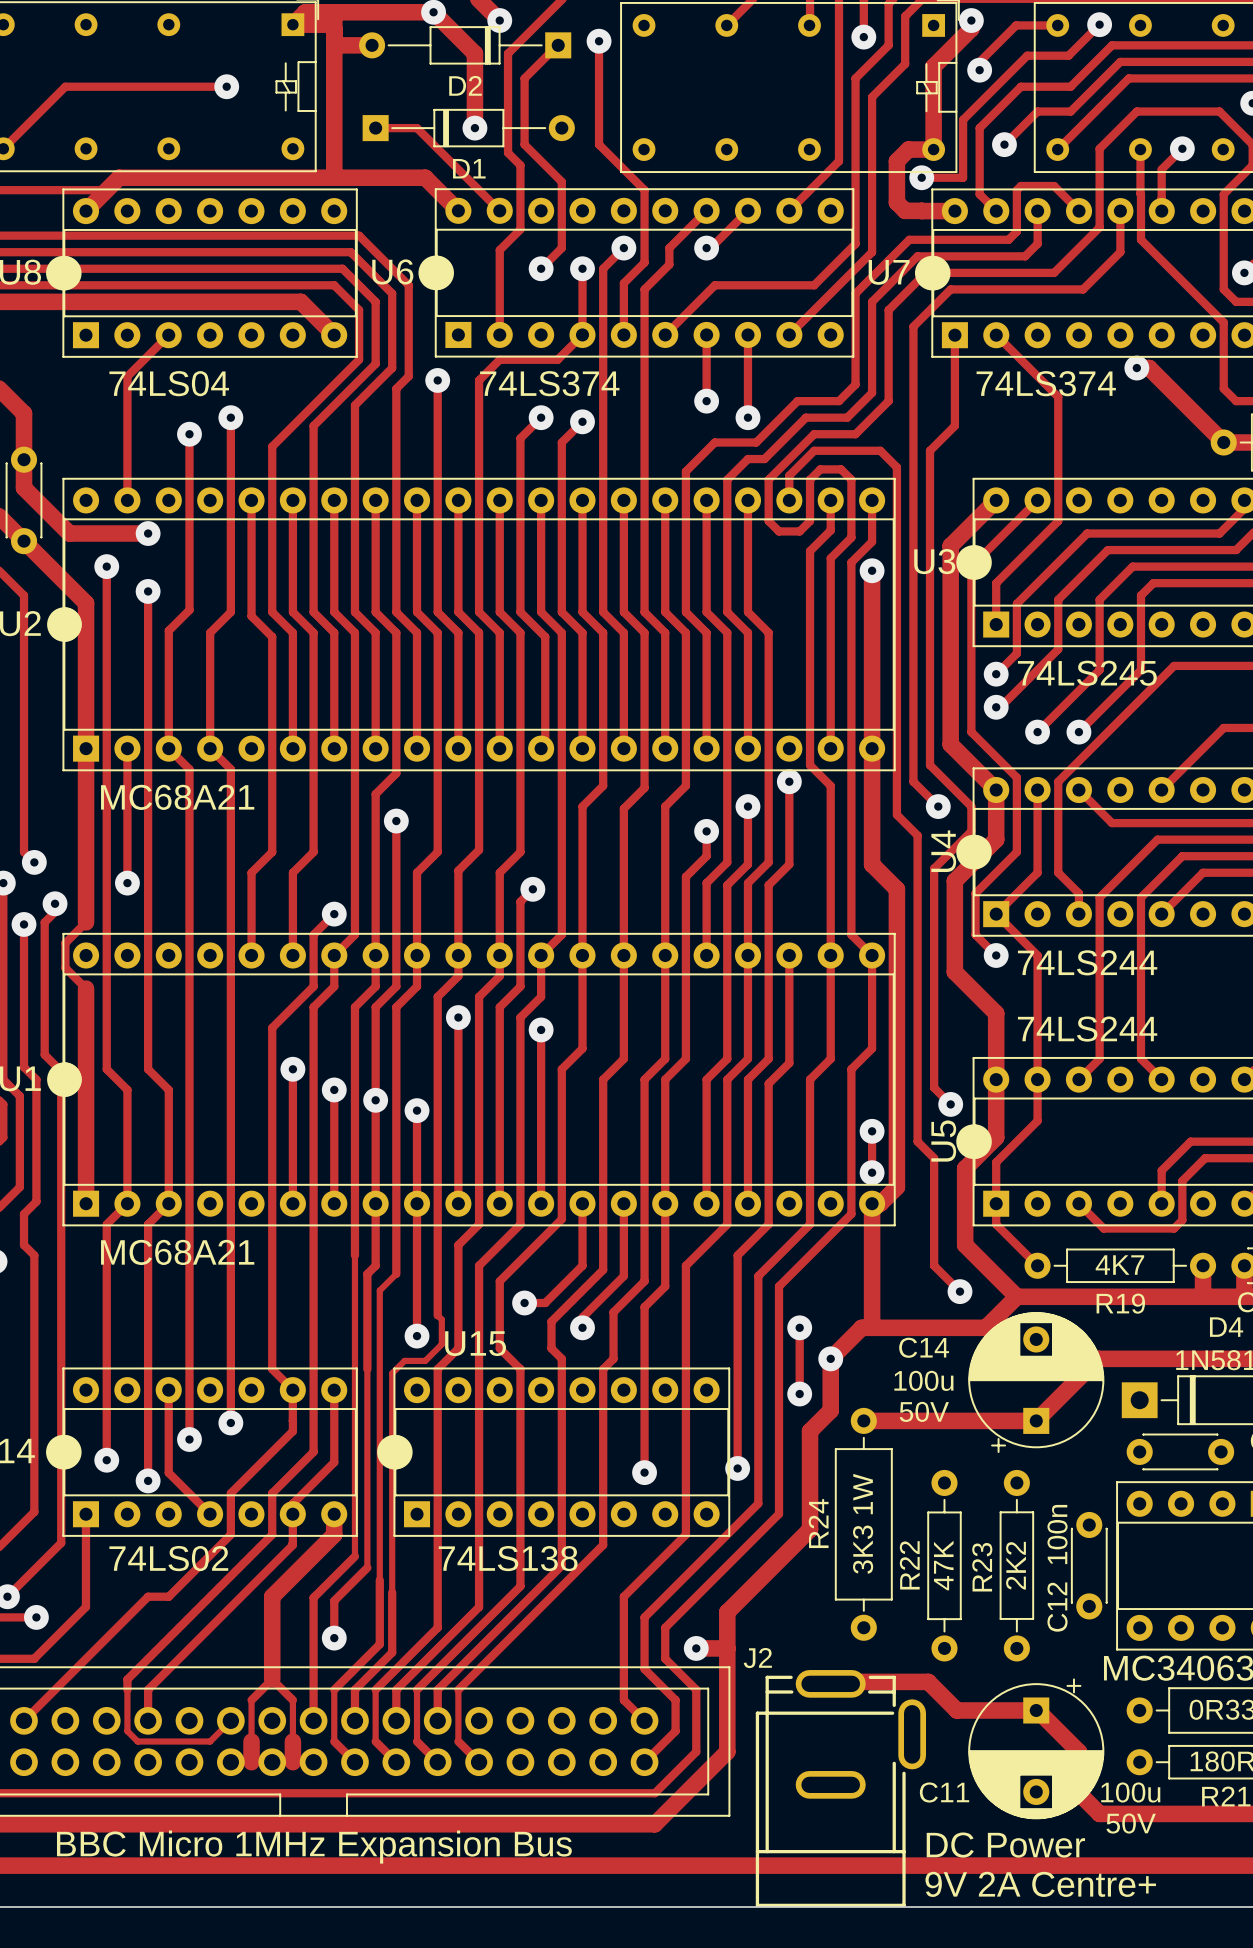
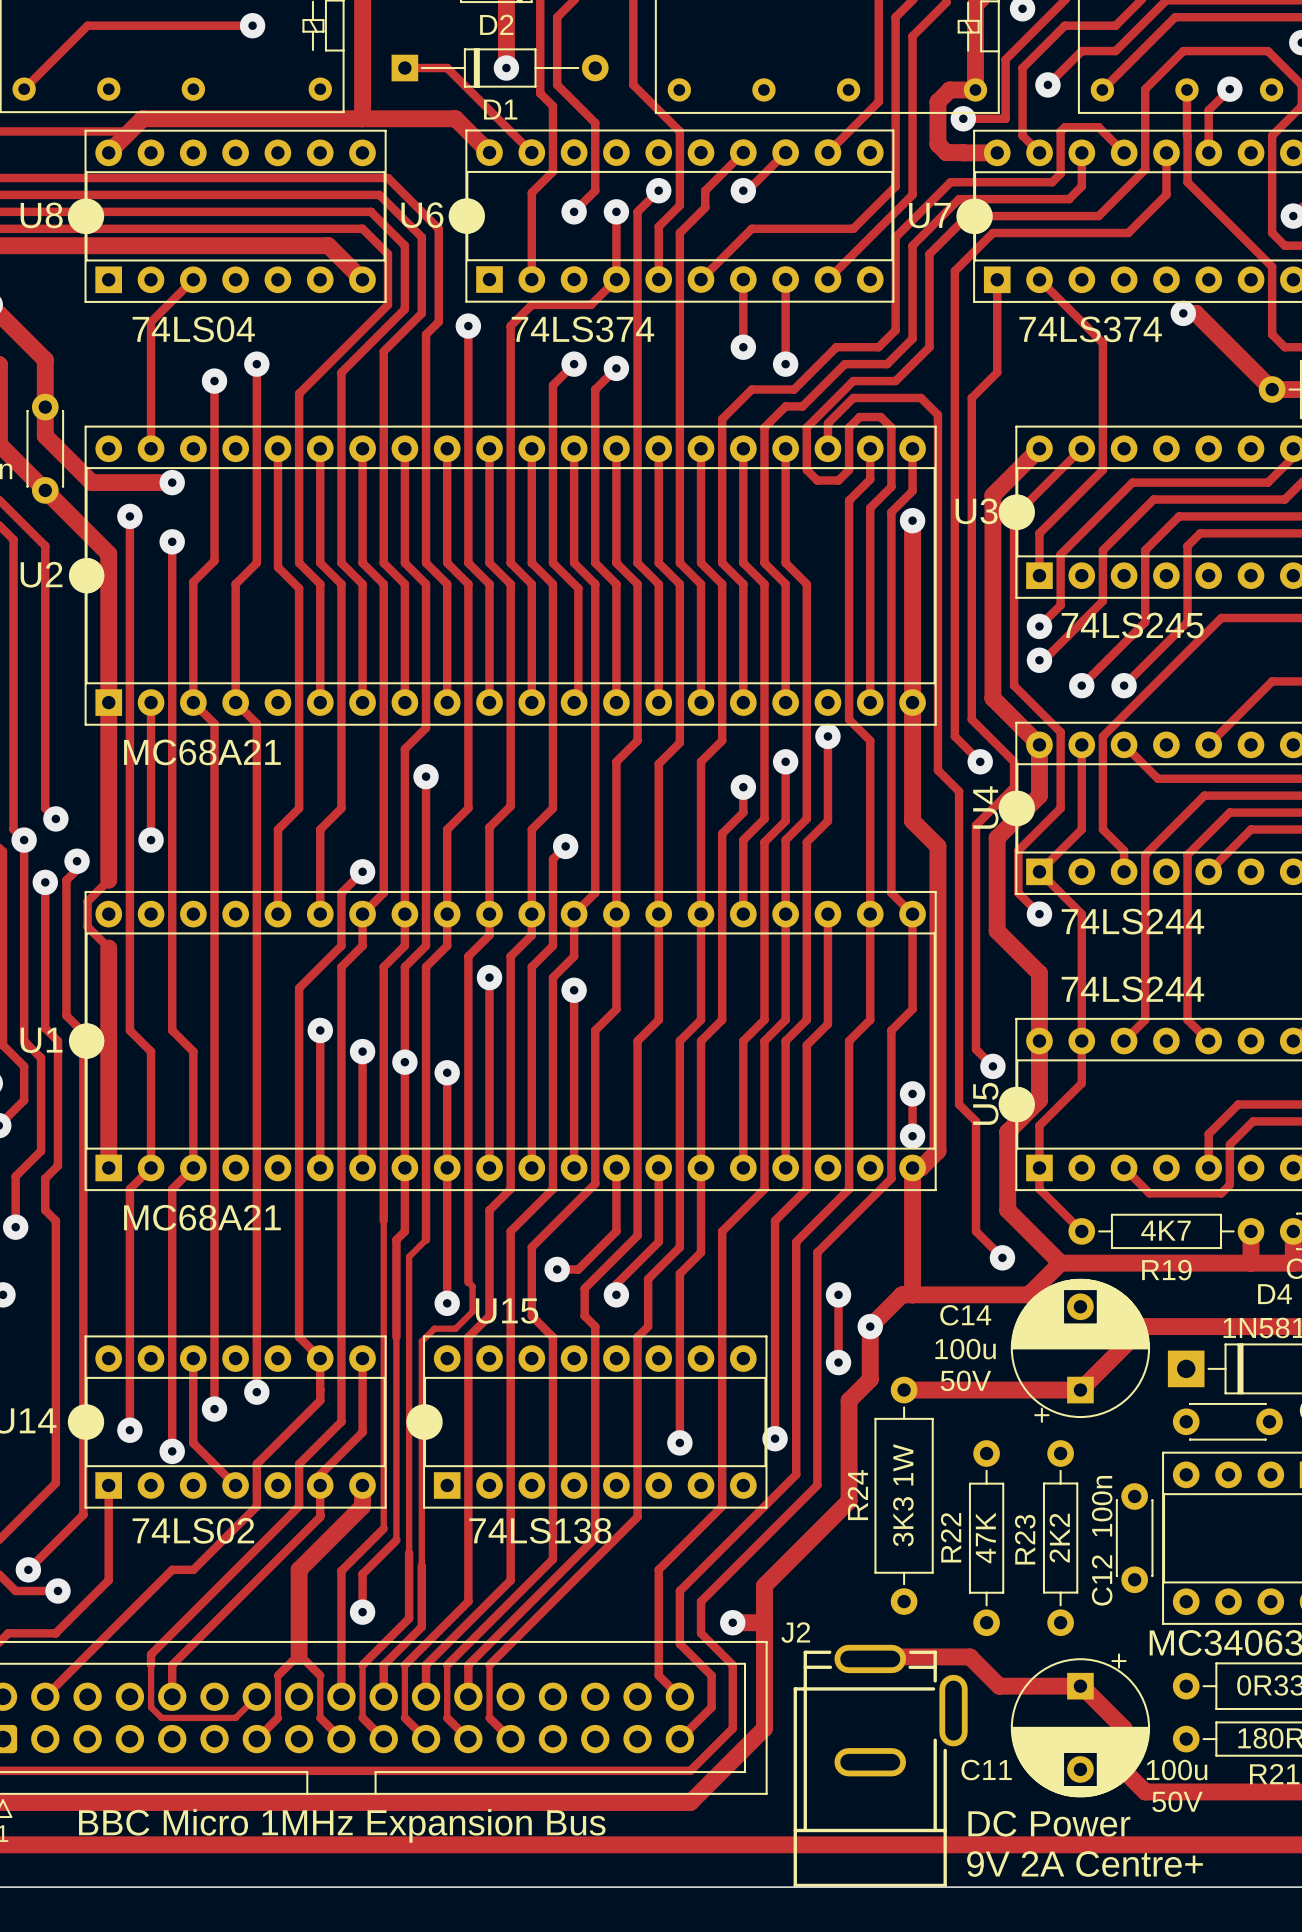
track: none -> (277, 1712) (277, 1717) (256, 1739)
track: none -> (320, 1712) (320, 1717) (341, 1739)
track: (251, 1741) (251, 1762) -> none
track: (292, 1741) (292, 1762) -> none

